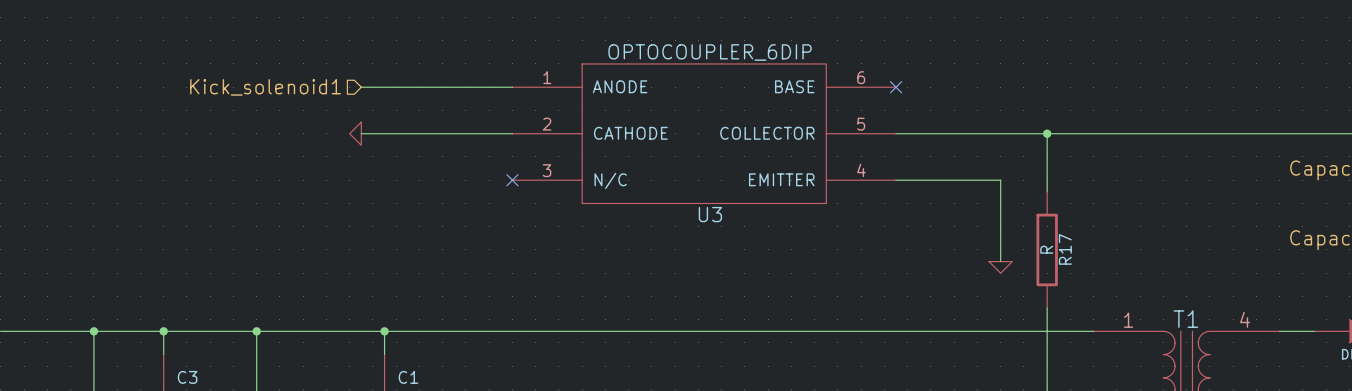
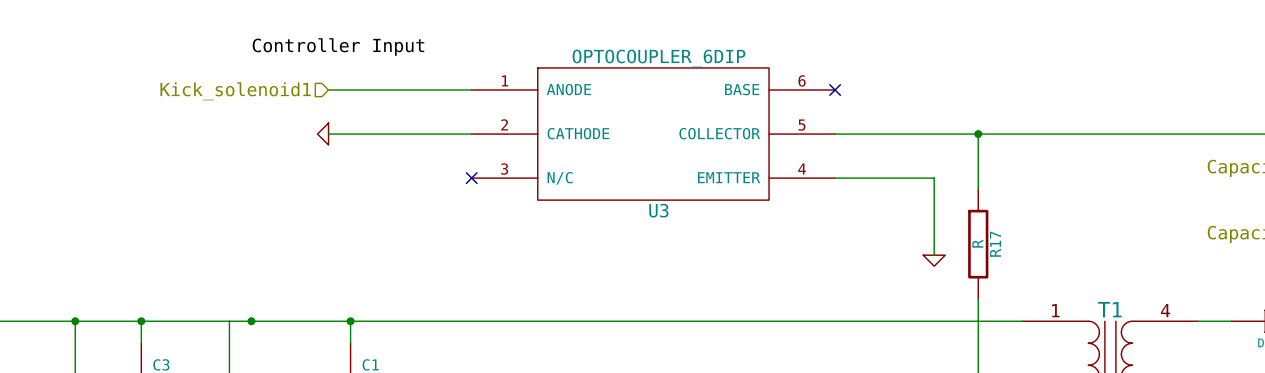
label: none -> Controller Input (338, 46)
junction position: (256, 331) -> (251, 321)

